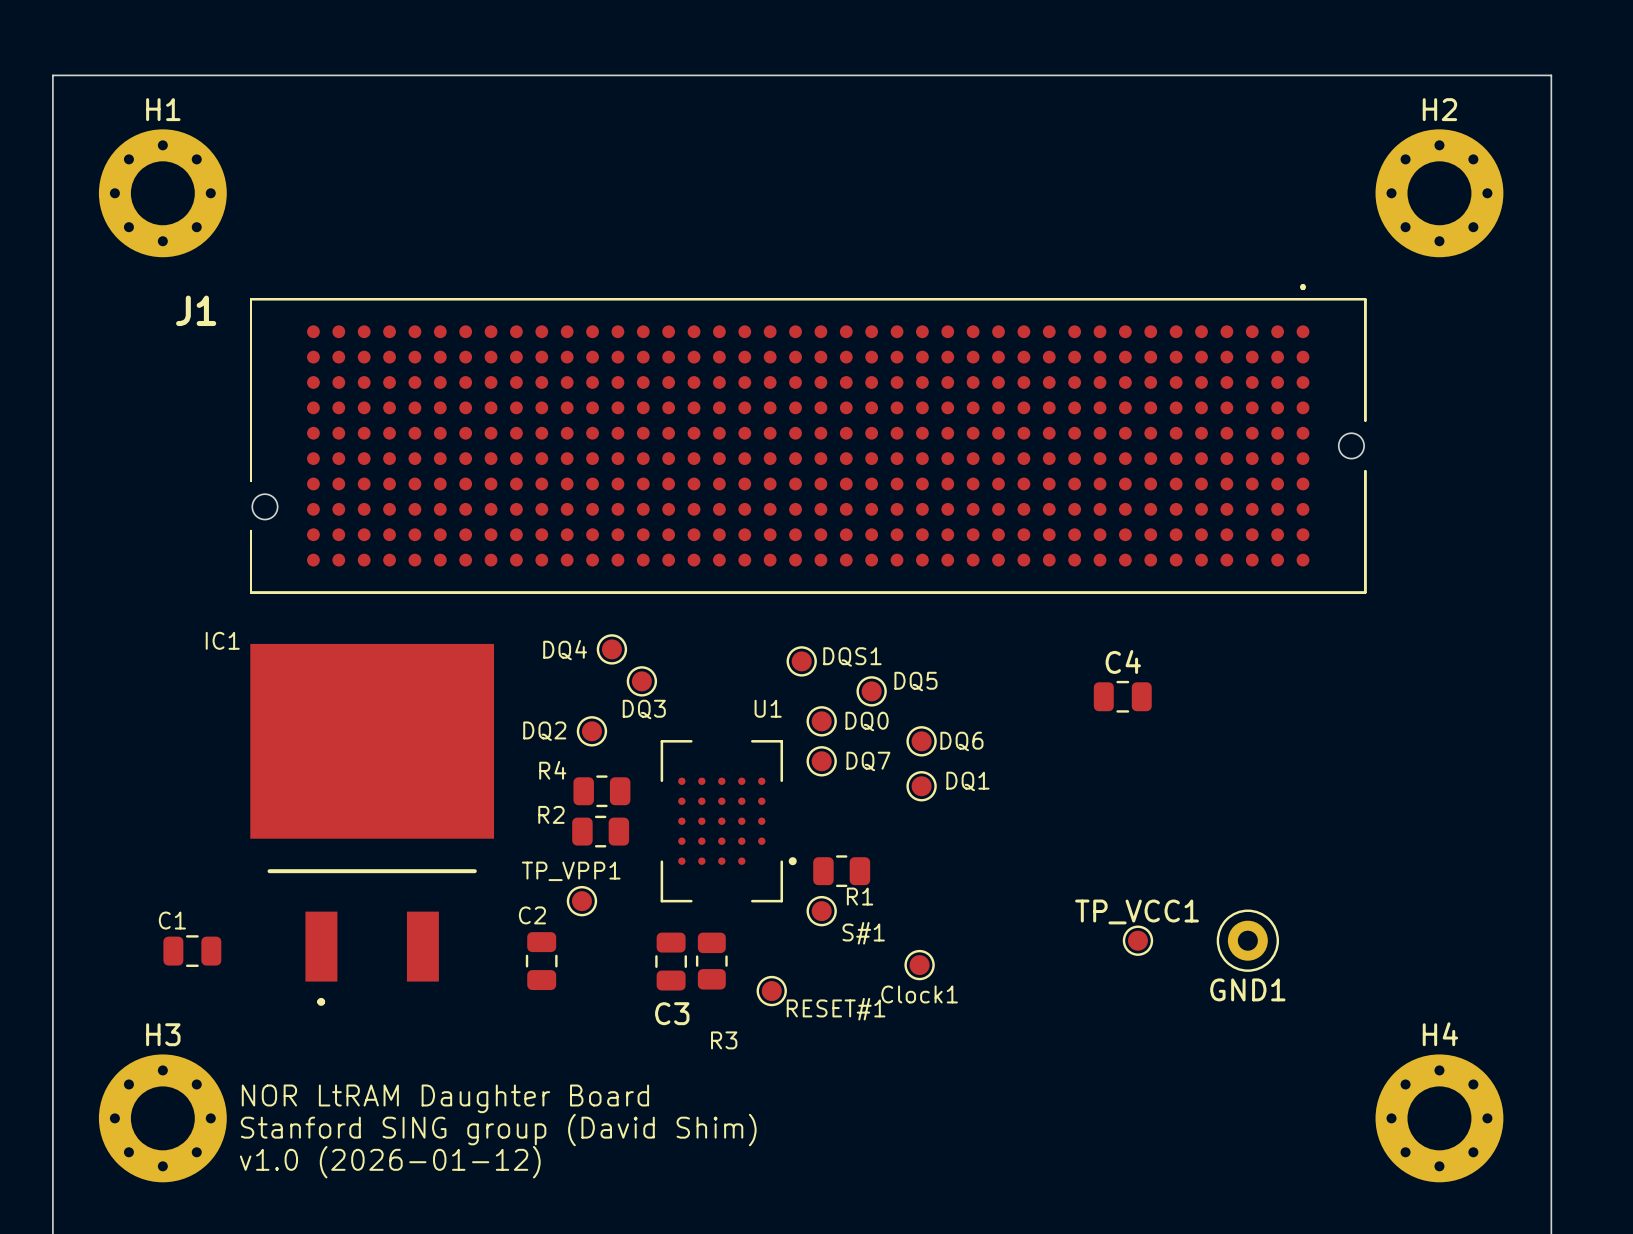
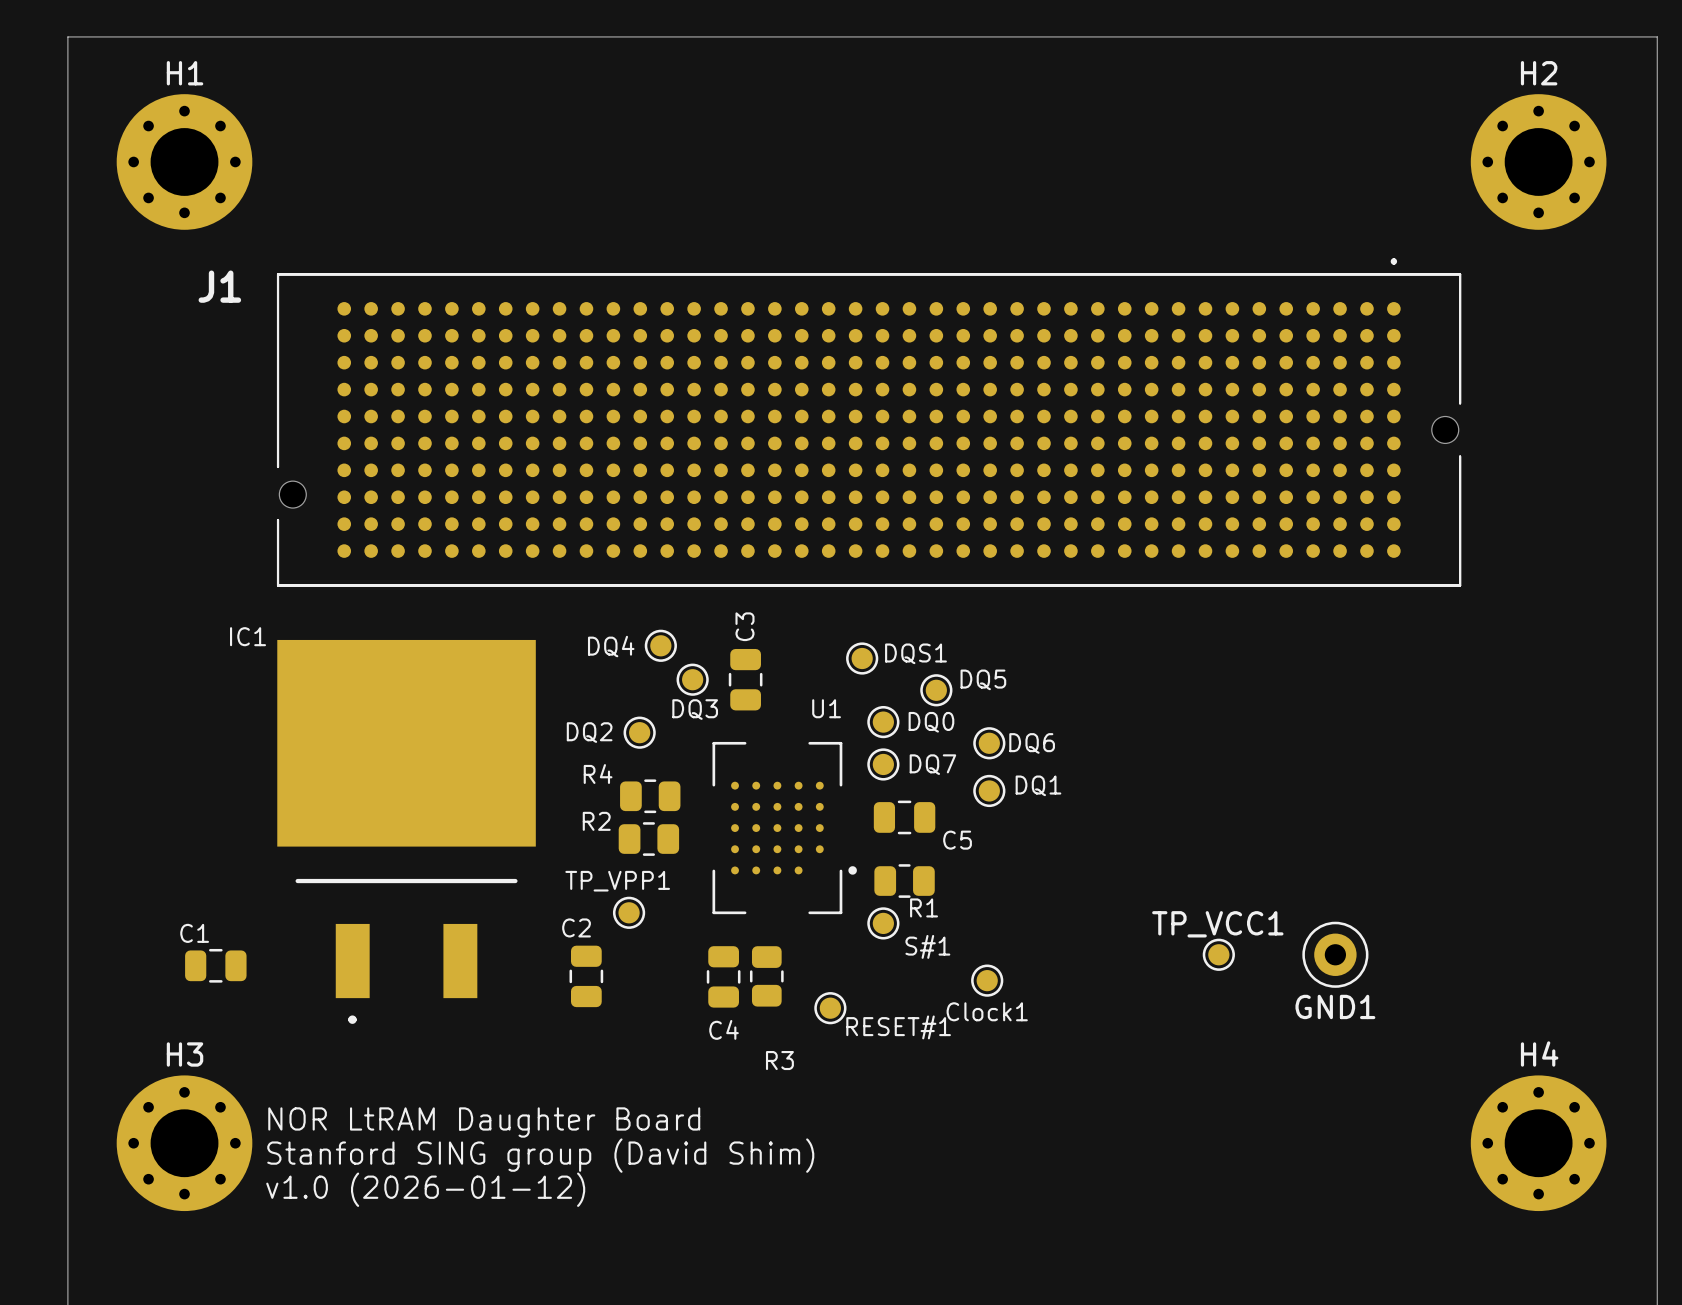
C3: none -> (745, 679)
C4: (1122, 696) -> none
C5: none -> (904, 817)
C3 name: C3 (672, 1013) -> C4 (724, 1029)

